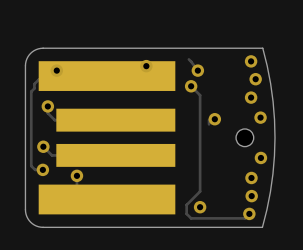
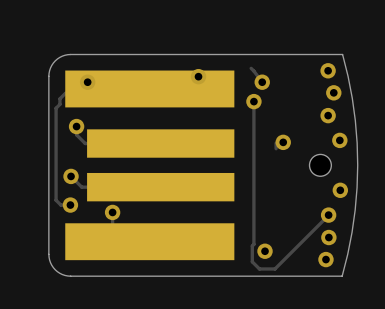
track: (191, 86) (200, 95) (200, 191) (186, 204) (186, 213) (191, 218) (244, 218) (249, 213) -> (253, 101) (252, 261) (259, 268) (274, 268) (331, 212)

